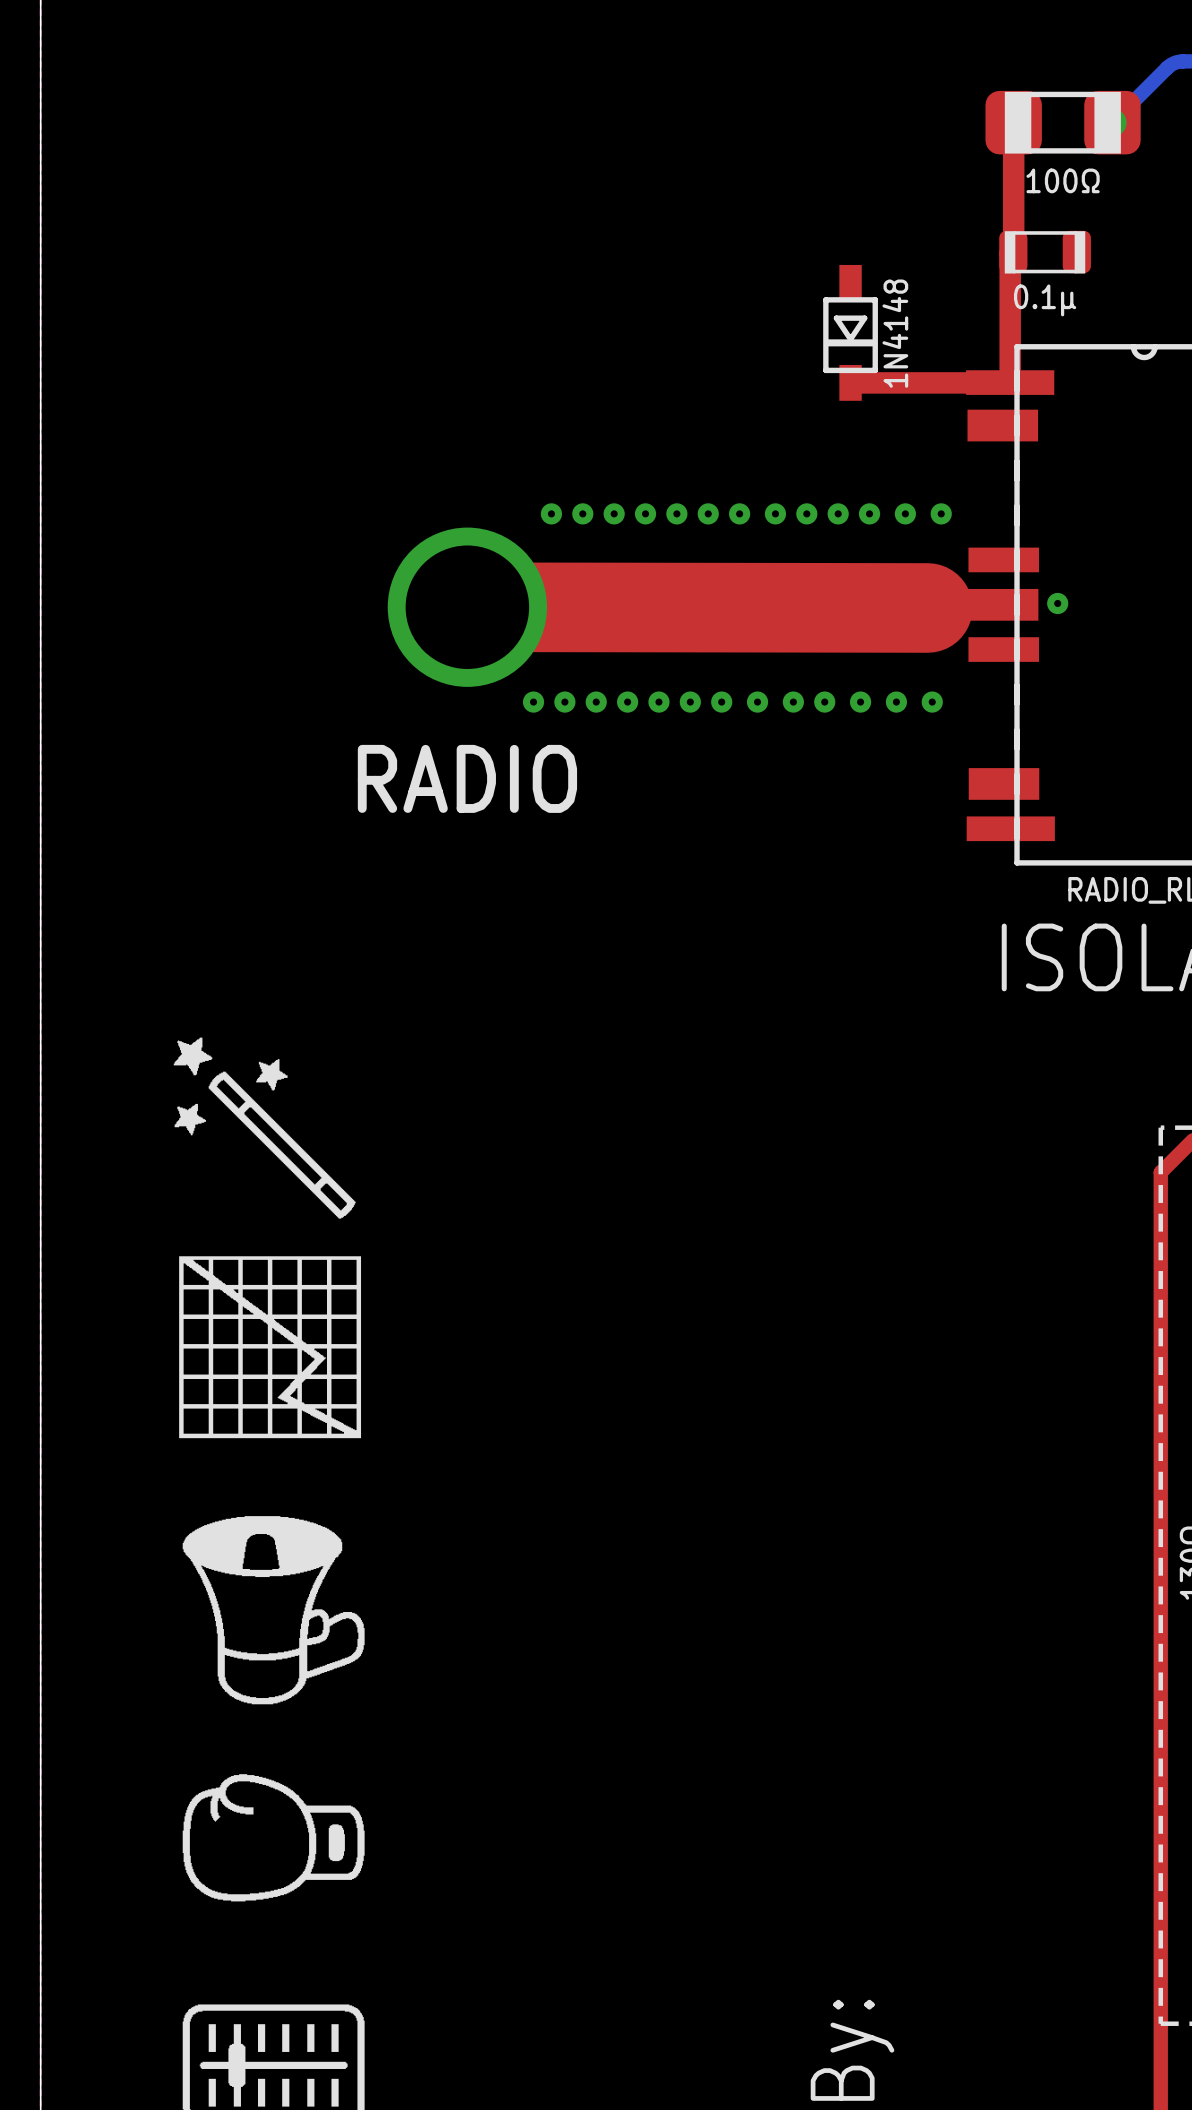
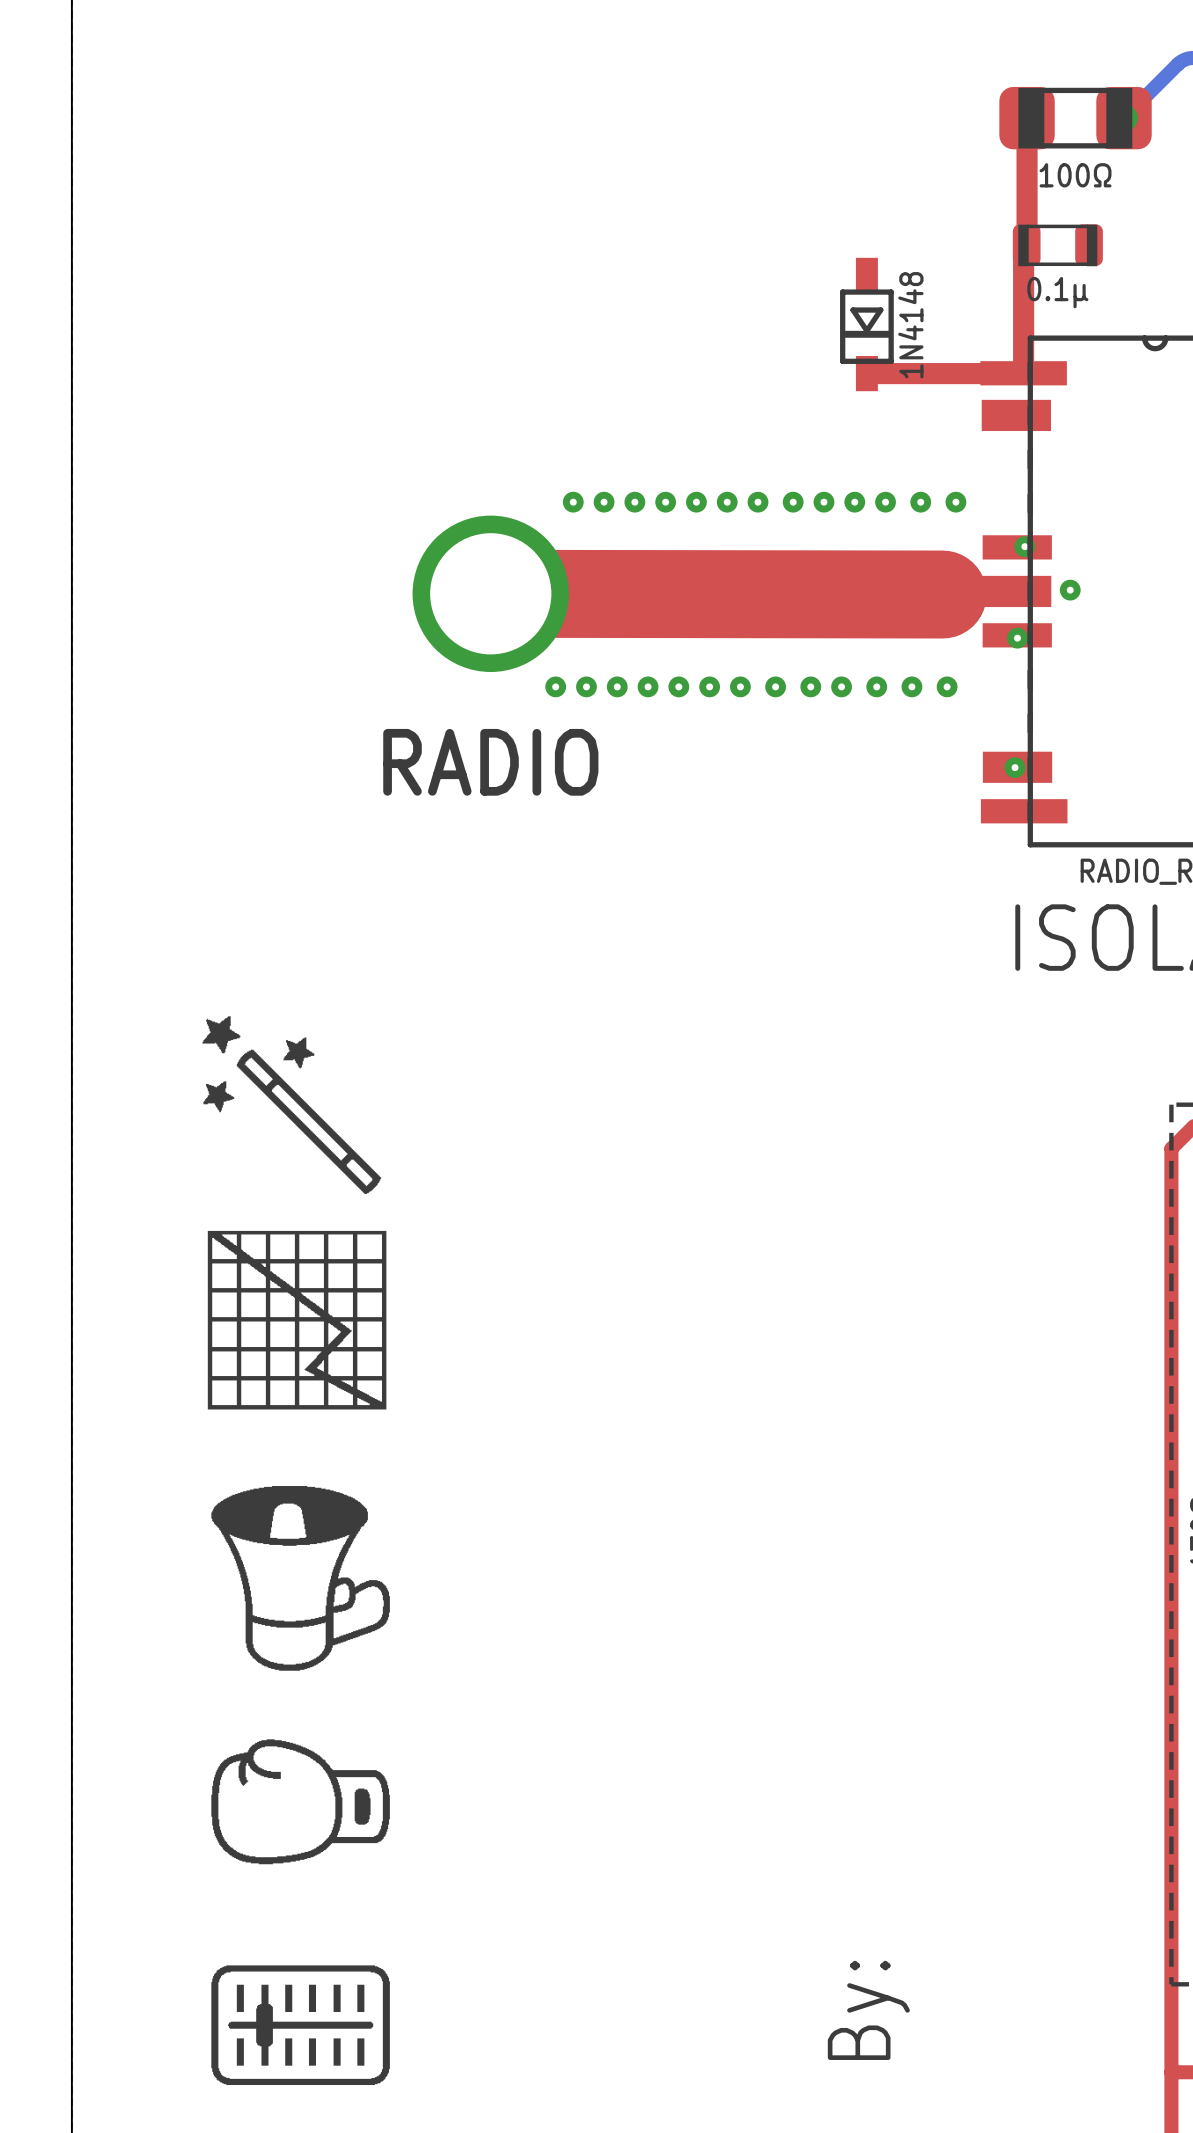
via: none -> (1024, 546)
via: none -> (1017, 638)
via: none -> (1015, 767)

